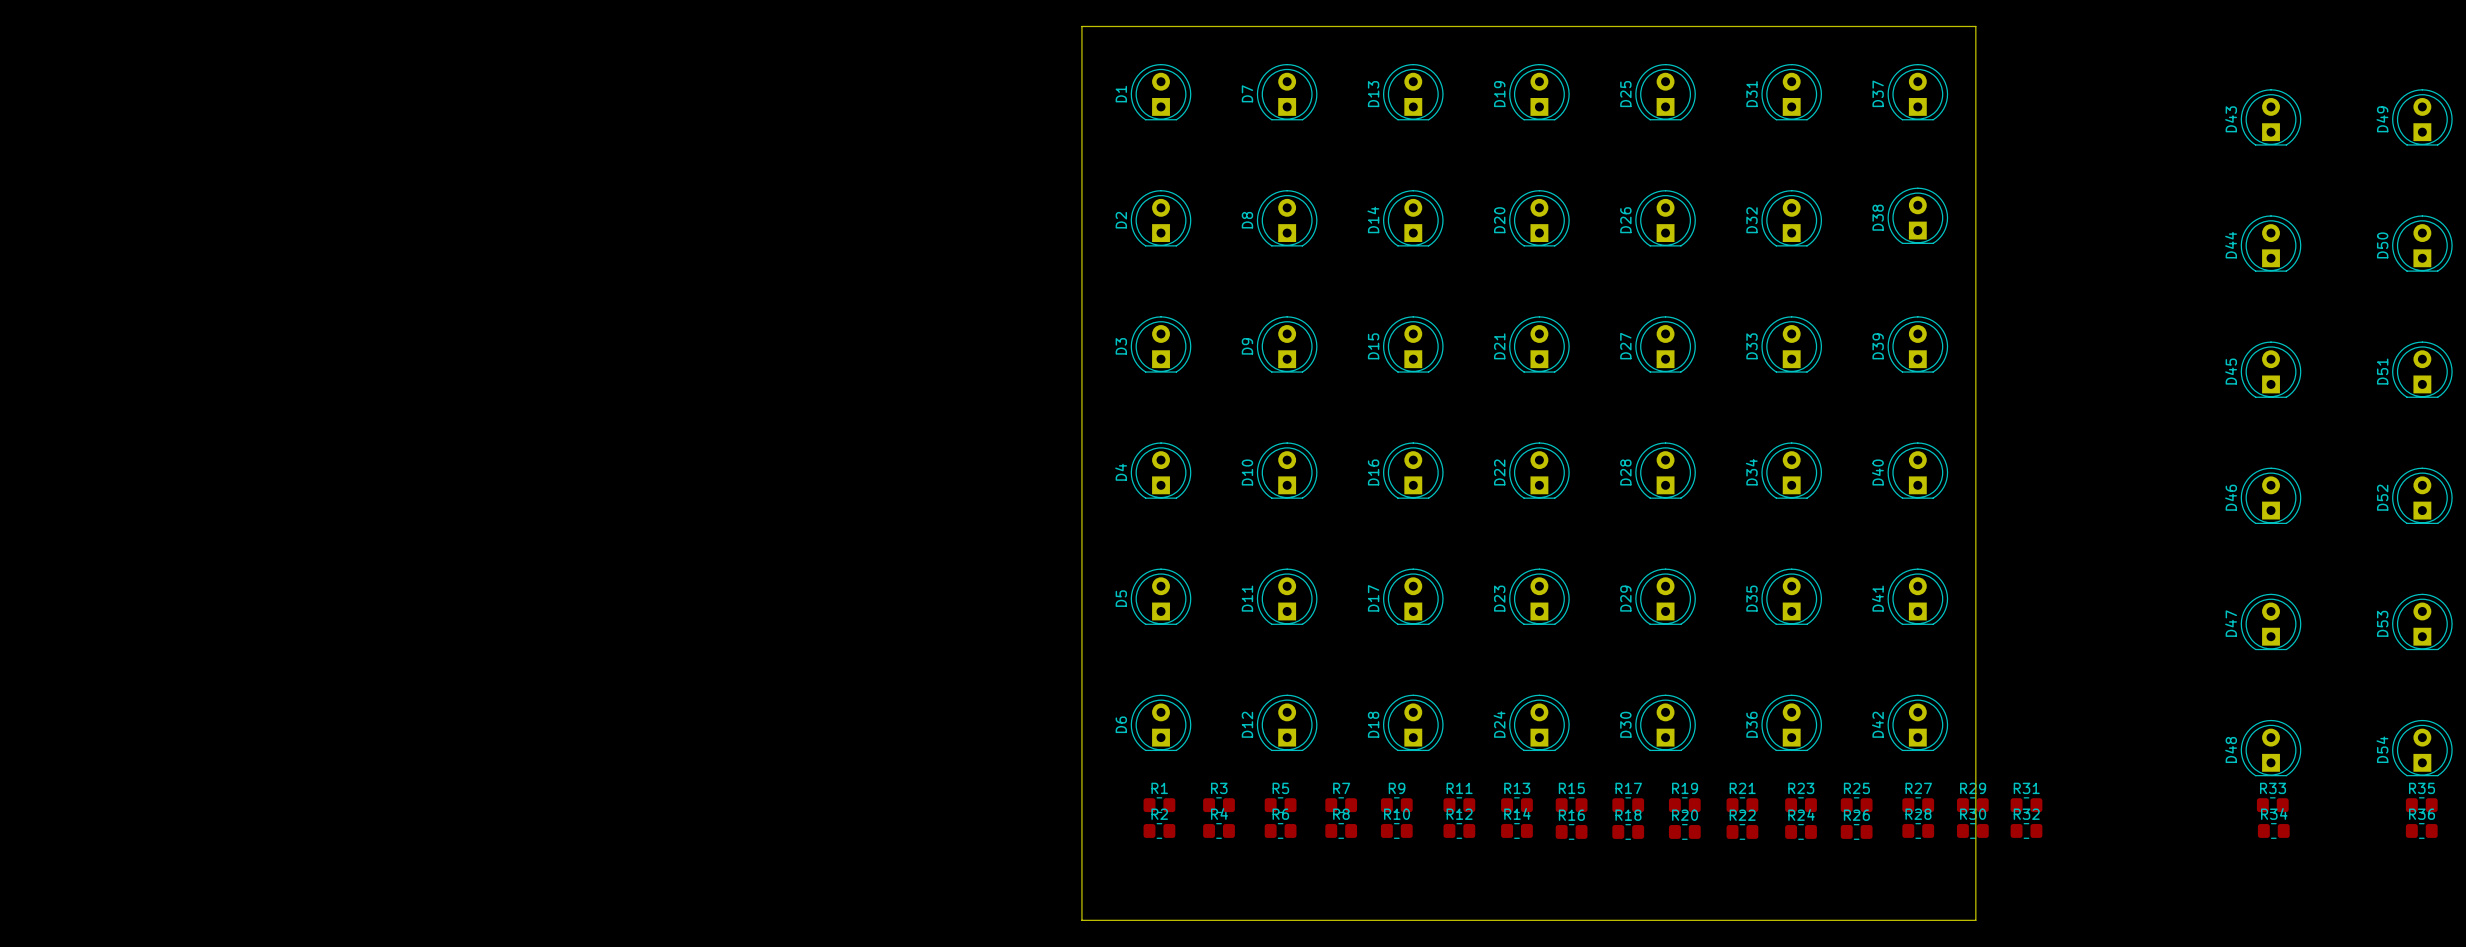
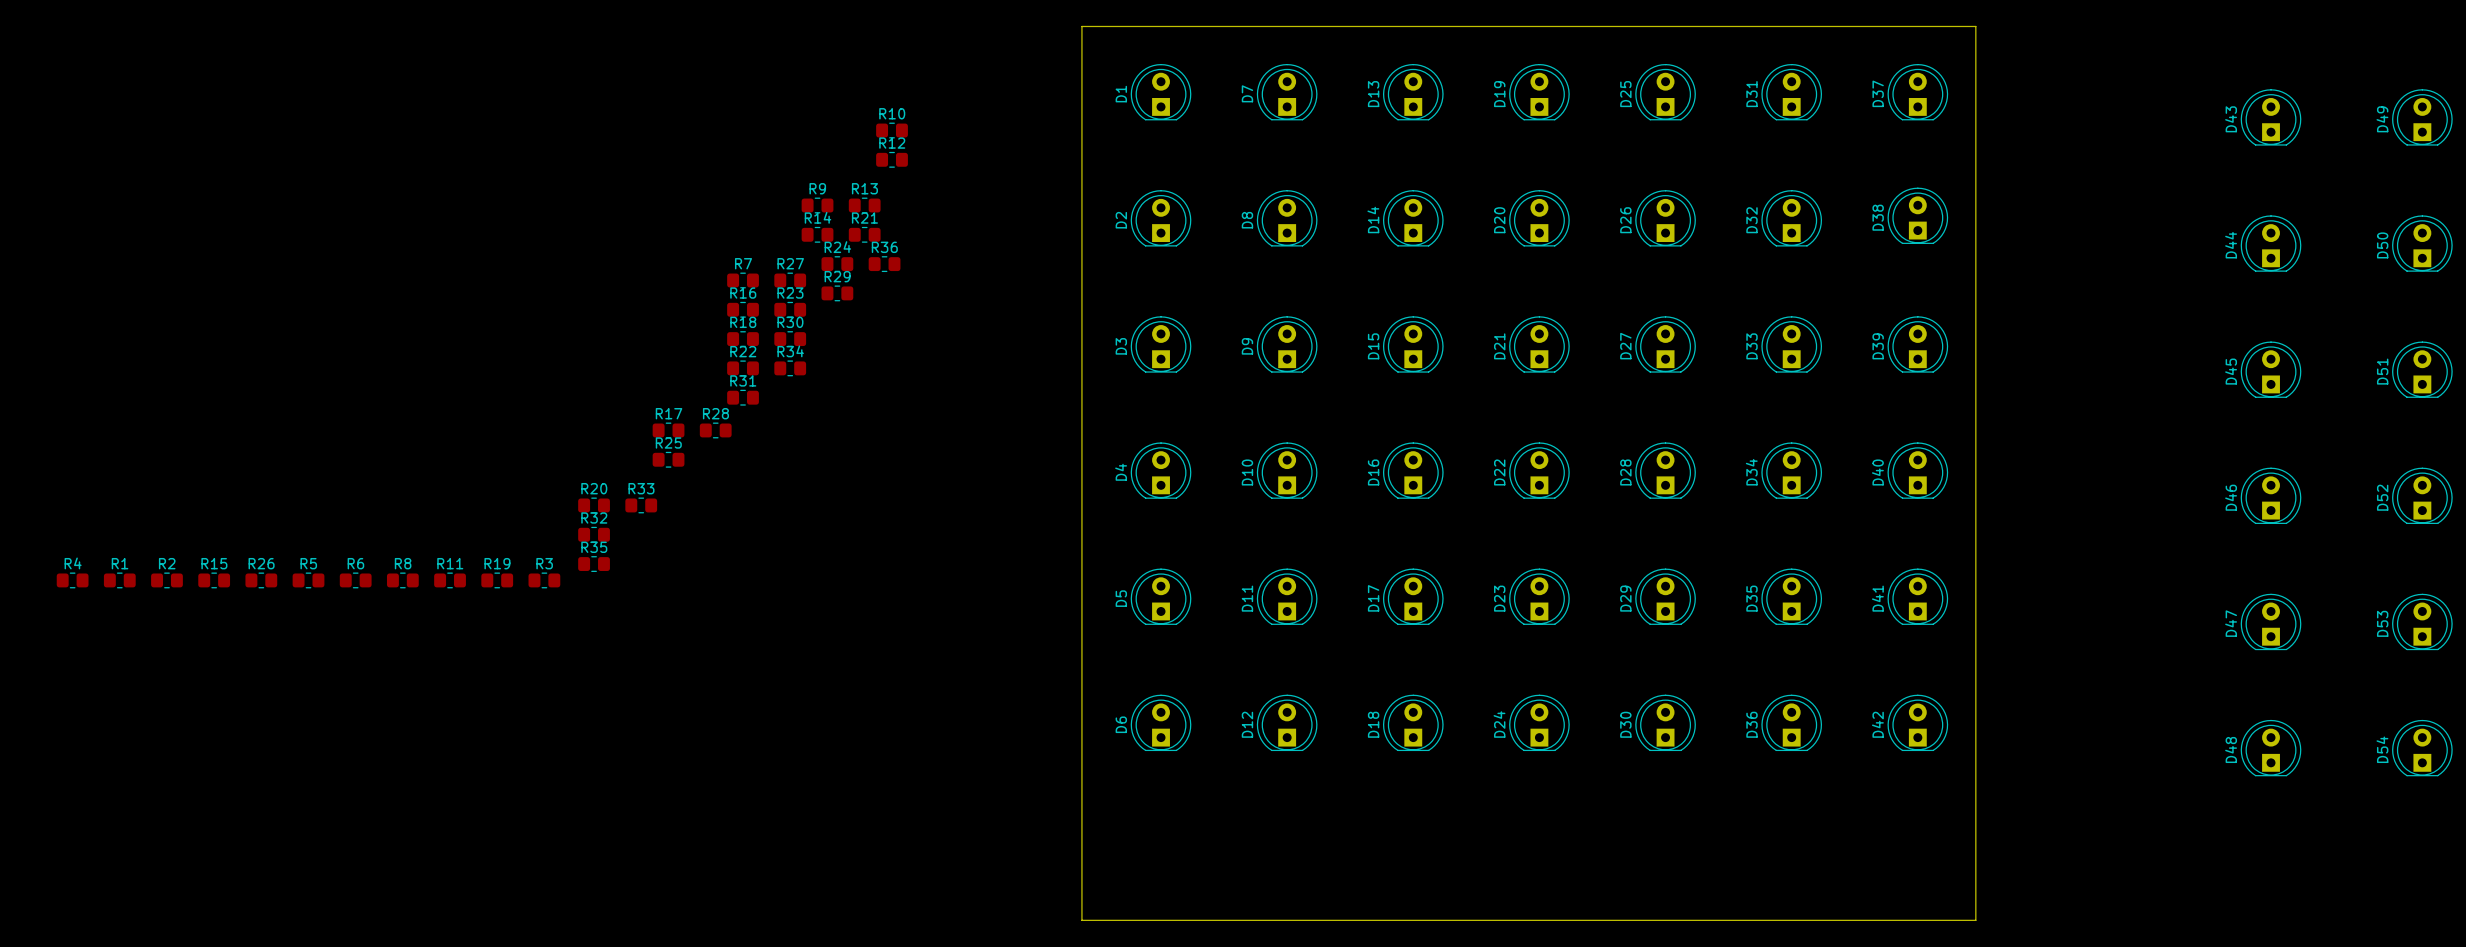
R1 position: (1159, 805) -> (119, 580)
R3 position: (1219, 805) -> (544, 580)
R5 position: (1280, 805) -> (308, 580)
R7 position: (1341, 805) -> (743, 280)
R9 position: (1396, 805) -> (817, 205)
R11 position: (1459, 805) -> (450, 580)
R13 position: (1516, 805) -> (864, 205)
R15 position: (1571, 805) -> (214, 580)
R17 position: (1628, 805) -> (668, 430)
R19 position: (1684, 805) -> (497, 580)
R21 position: (1742, 805) -> (864, 234)
R23 position: (1801, 805) -> (790, 309)
R25 position: (1856, 805) -> (668, 459)
R27 position: (1918, 805) -> (790, 280)
R29 position: (1972, 805) -> (837, 293)
R31 position: (2026, 805) -> (743, 397)
R33 position: (2272, 805) -> (641, 505)
R35 position: (2421, 805) -> (594, 564)
R2 position: (1159, 830) -> (166, 580)
R4 position: (1219, 830) -> (72, 580)
R6 position: (1280, 830) -> (355, 580)
R8 position: (1341, 830) -> (402, 580)
R10 position: (1396, 830) -> (892, 130)
R12 position: (1459, 830) -> (892, 159)
R14 position: (1516, 830) -> (817, 234)
R28 position: (1918, 830) -> (715, 430)
R30 position: (1972, 830) -> (790, 339)
R32 position: (2026, 830) -> (594, 534)
R34 position: (2273, 830) -> (790, 368)
R36 position: (2421, 830) -> (884, 264)
R16 position: (1571, 831) -> (743, 309)
R18 position: (1628, 831) -> (743, 339)
R20 position: (1684, 831) -> (594, 505)
R22 position: (1742, 831) -> (743, 368)
R24 position: (1801, 831) -> (837, 264)
R26 position: (1856, 831) -> (261, 580)

